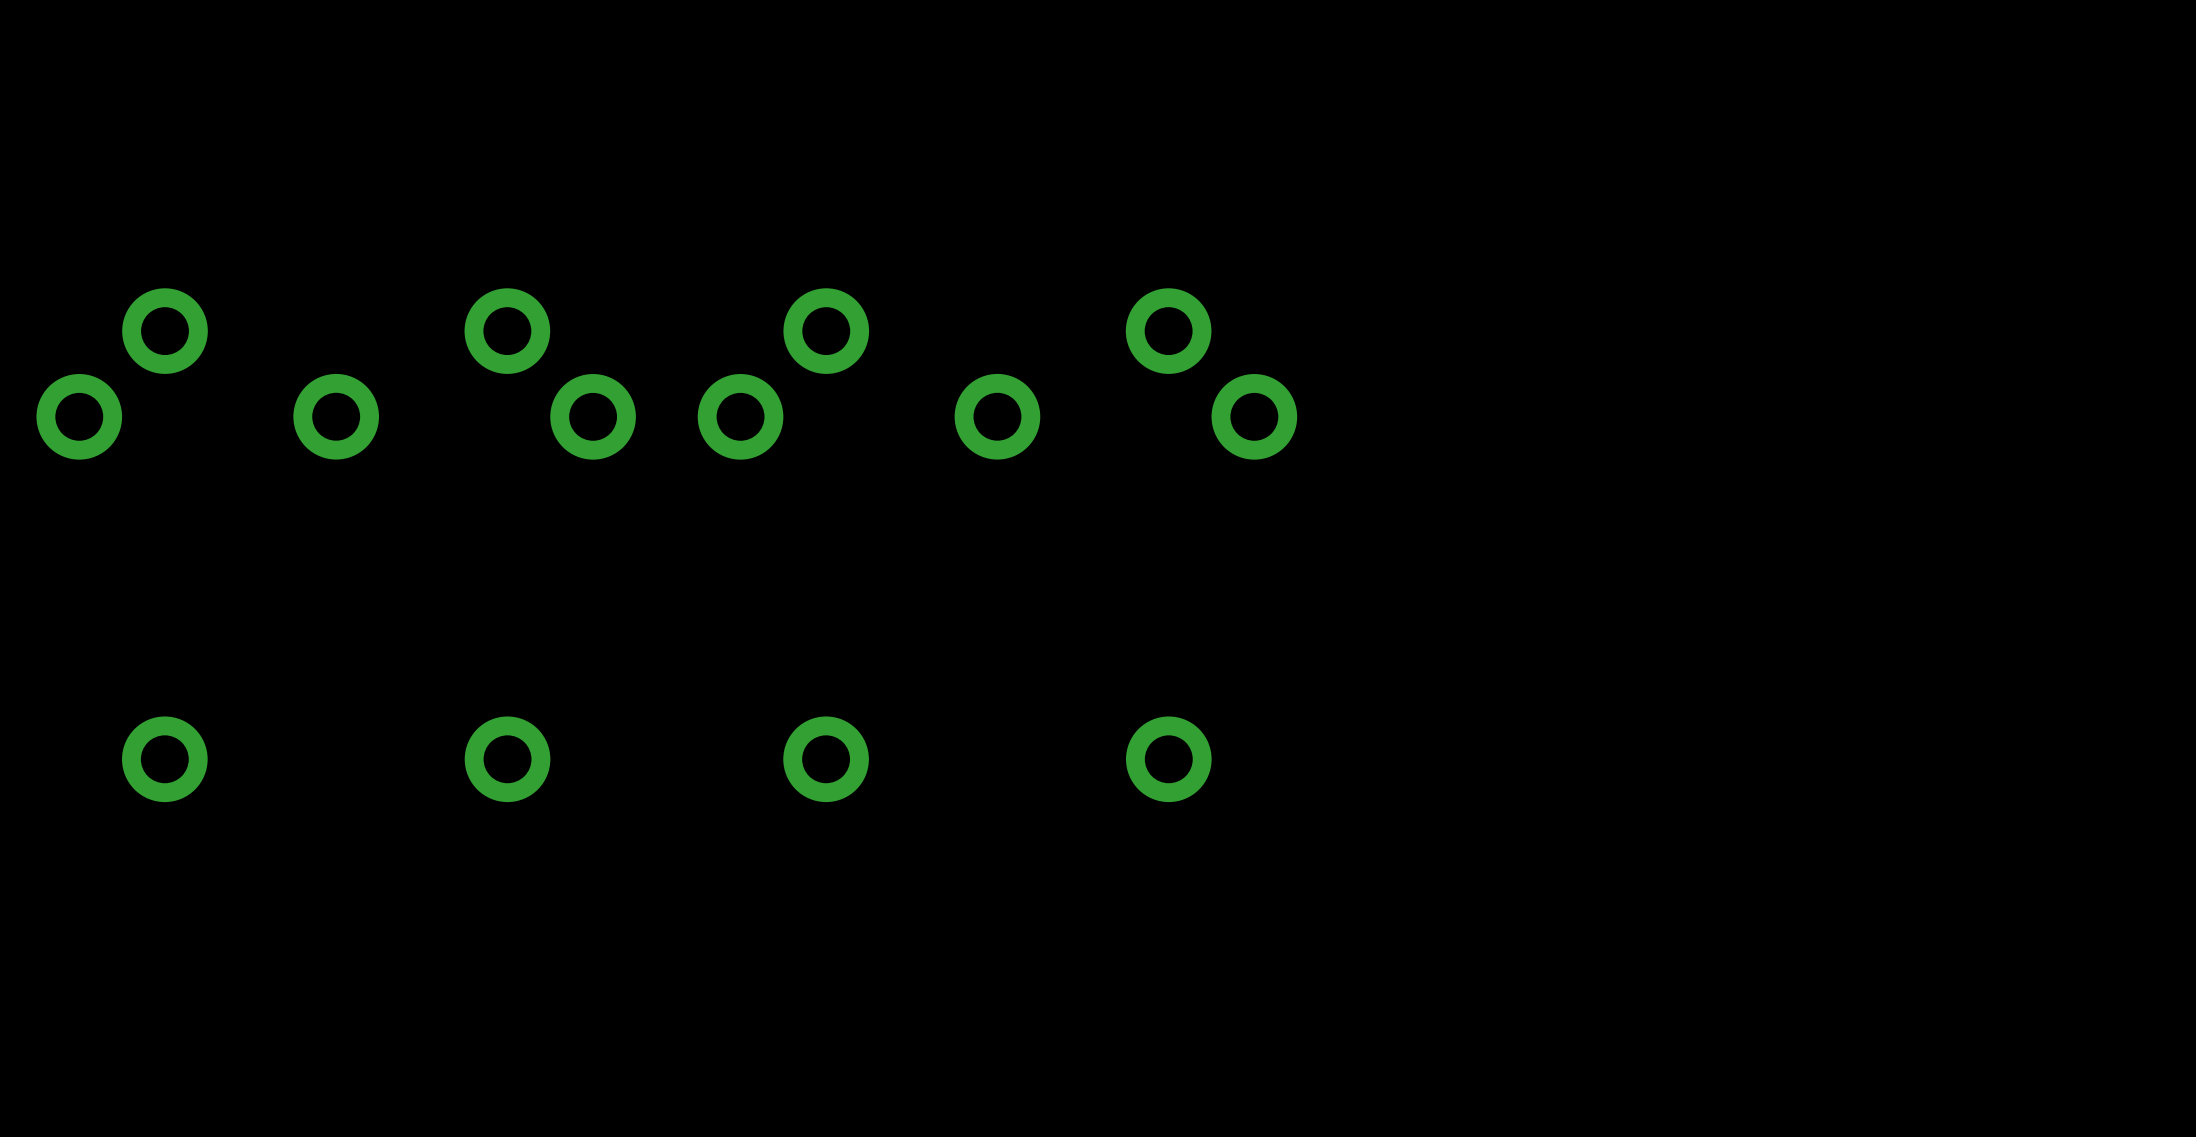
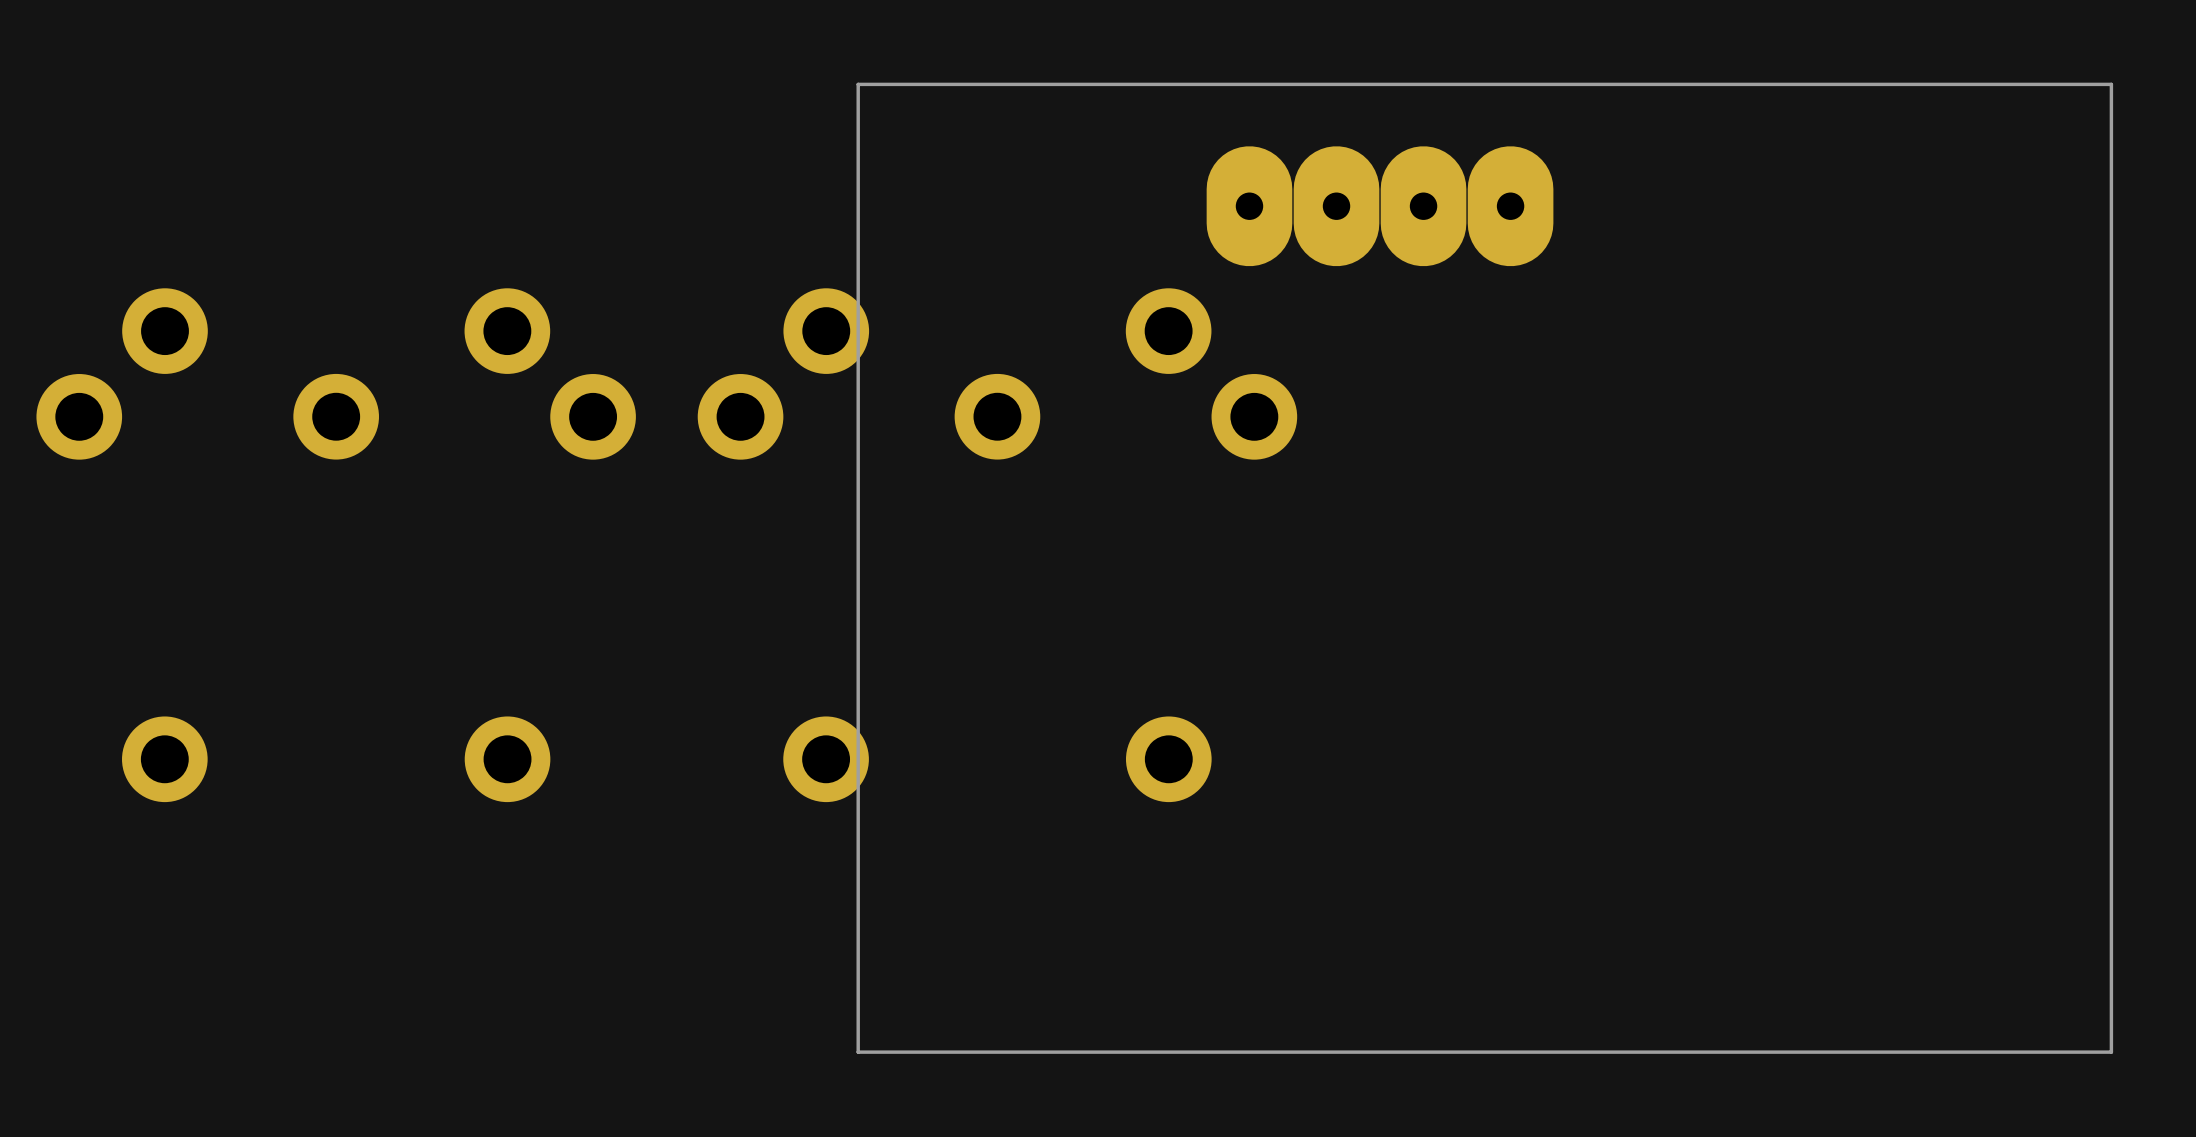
board edge: none -> (2111, 84) (2111, 1052) (858, 1052) (858, 84) (2111, 84)
part: none -> (1380, 206)

